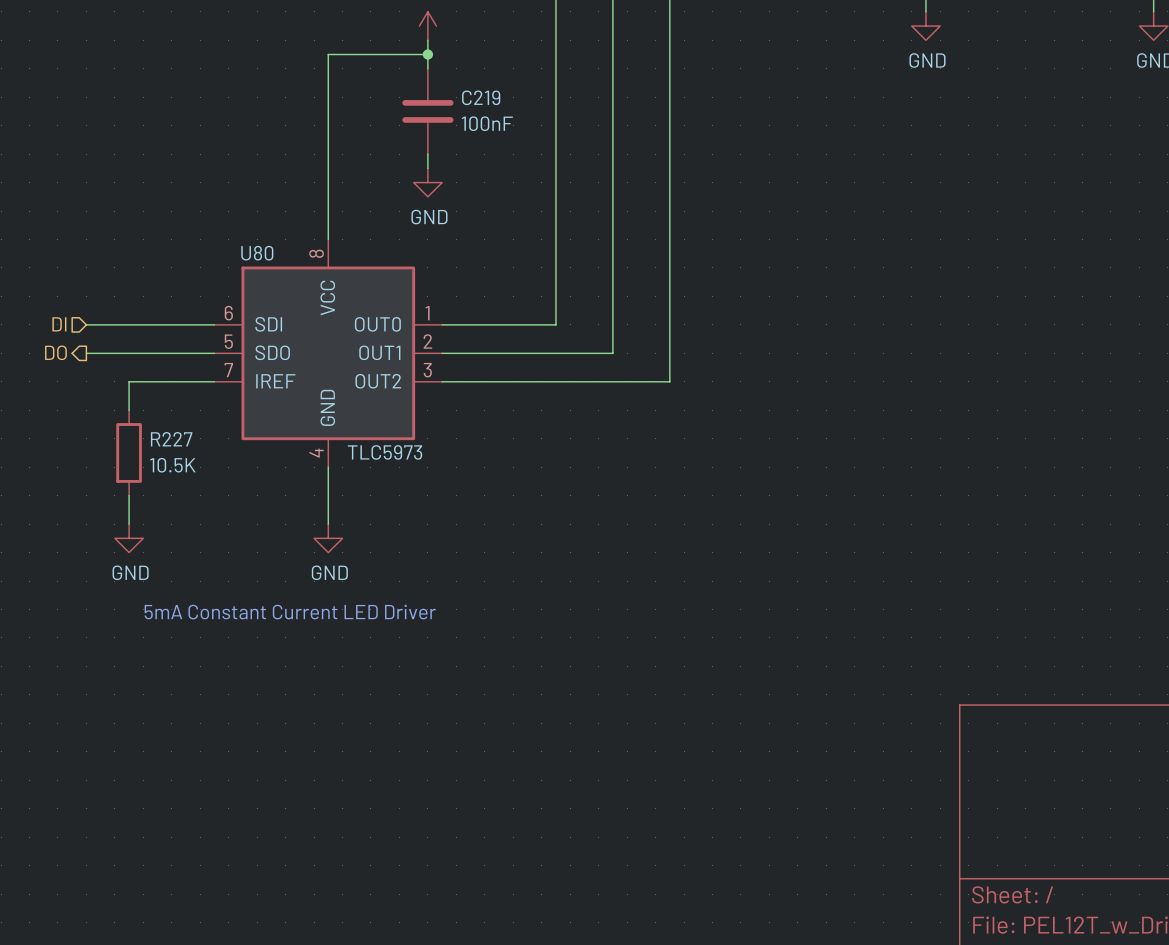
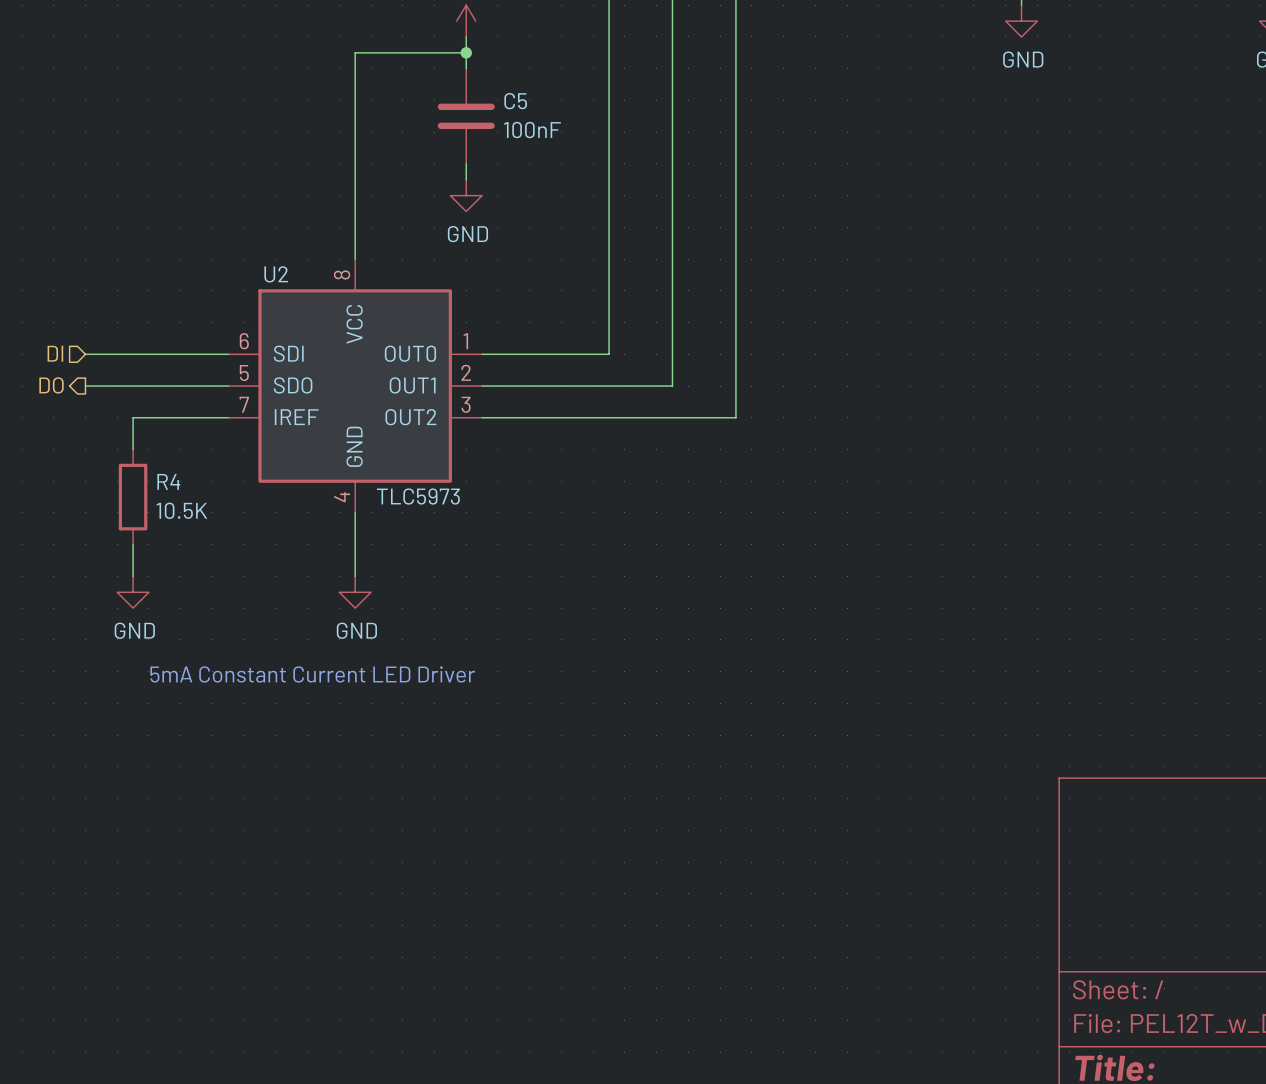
C219 name: C219 (481, 97) -> C5 (515, 101)
U80 name: U80 (257, 253) -> U2 (276, 274)
R227 name: R227 (171, 439) -> R4 (168, 481)

